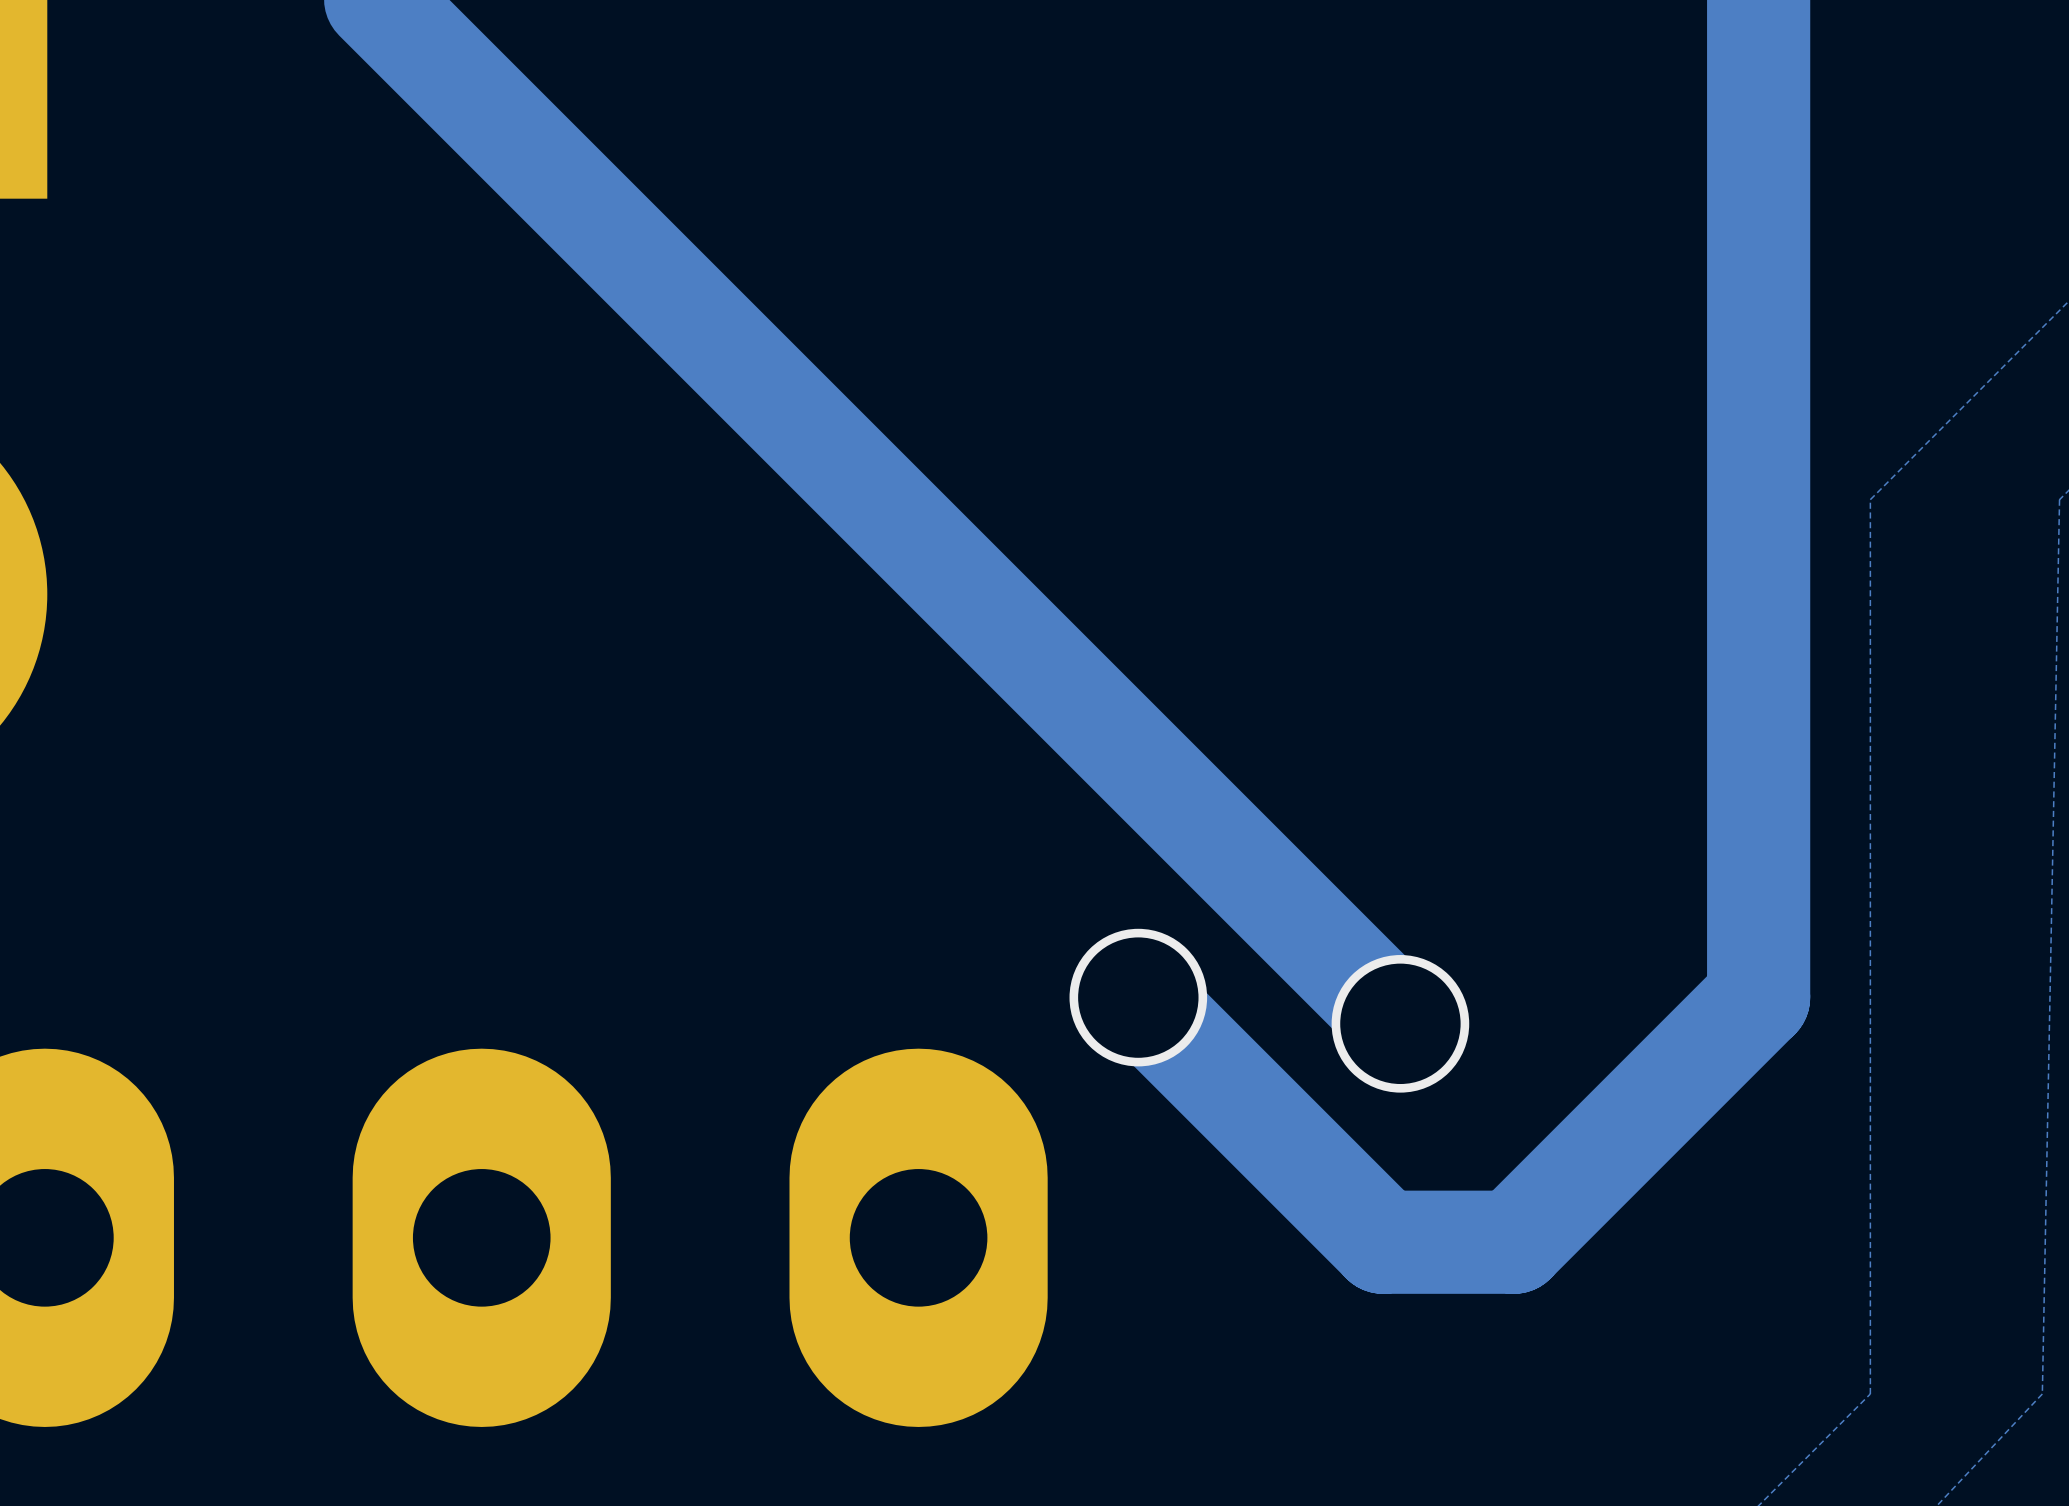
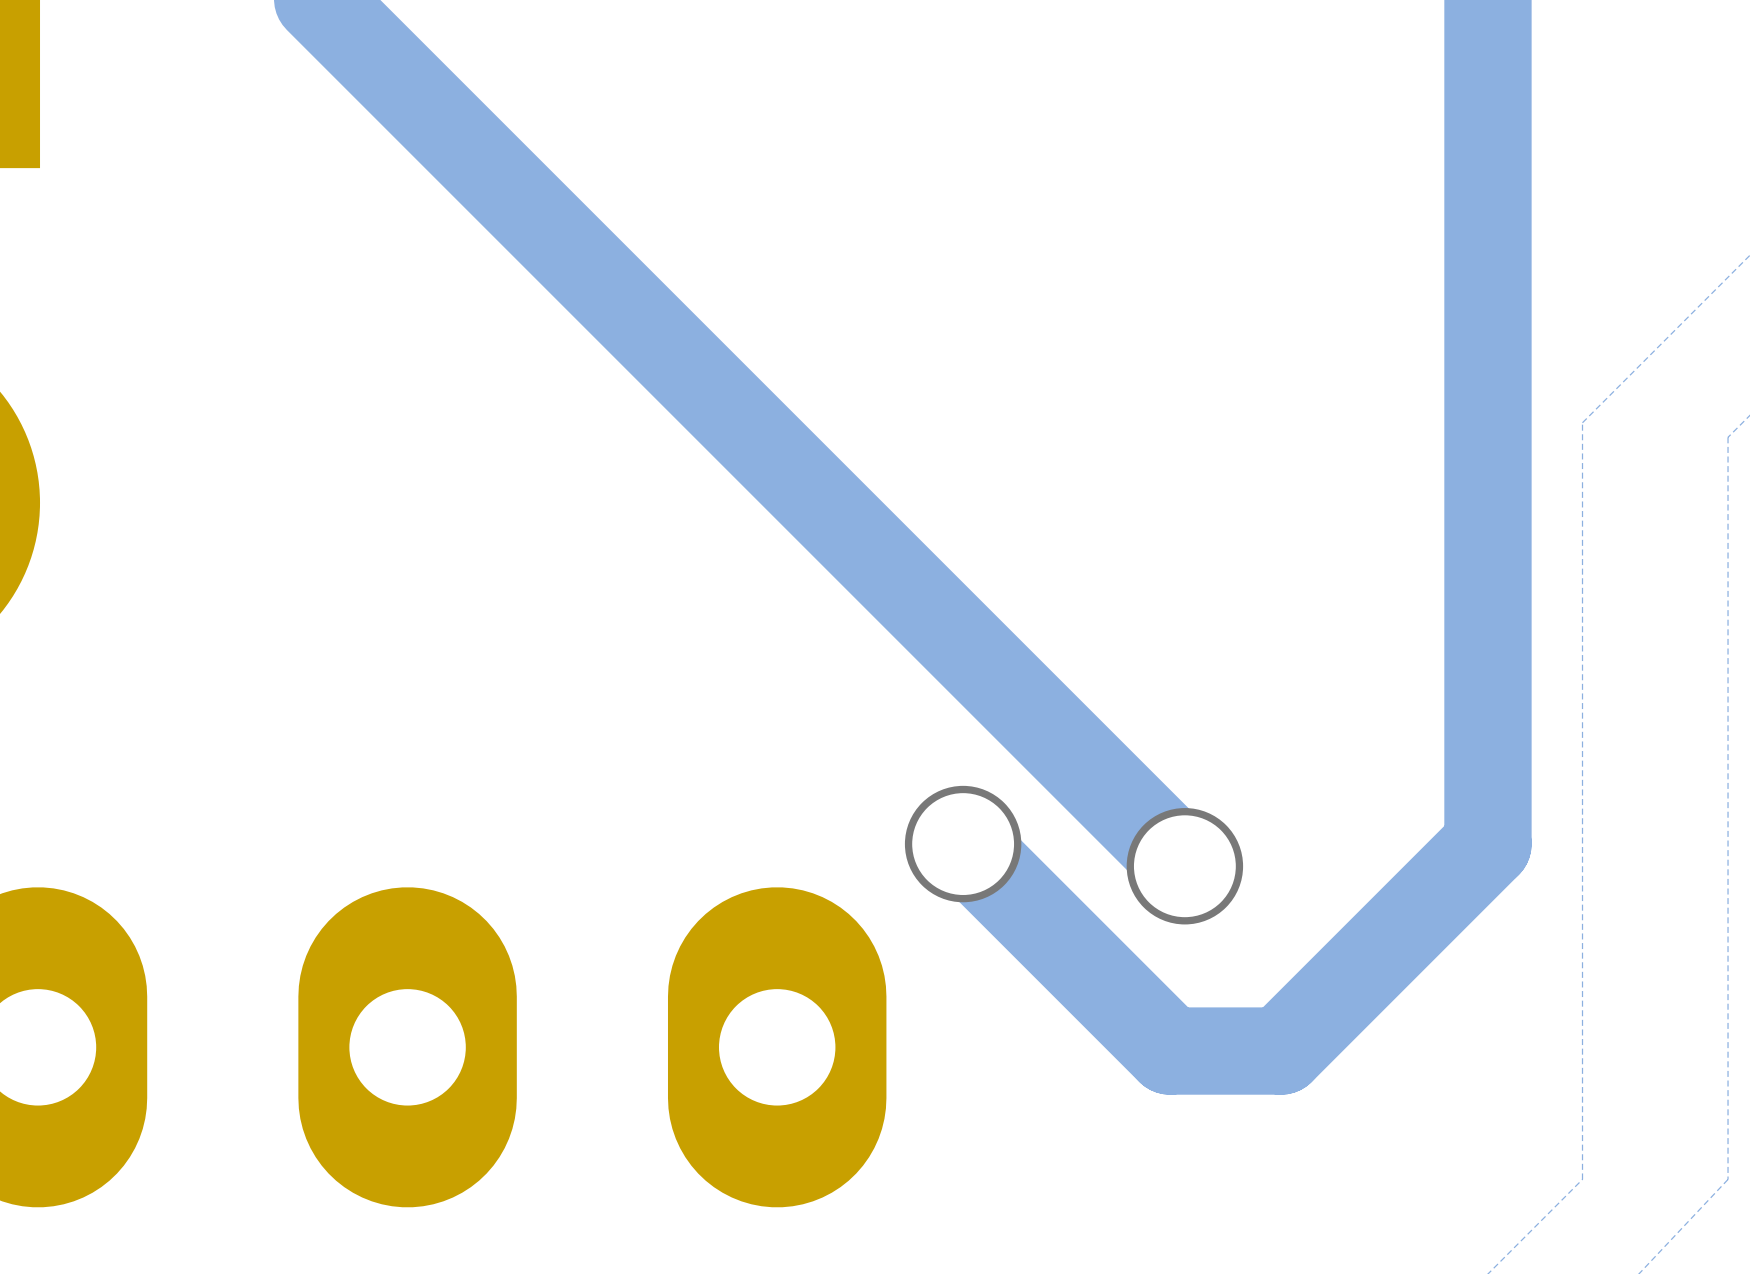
zone outline: (2059, 499) (2042, 1394) -> (1742, 422) (1728, 437) (1728, 1179)

